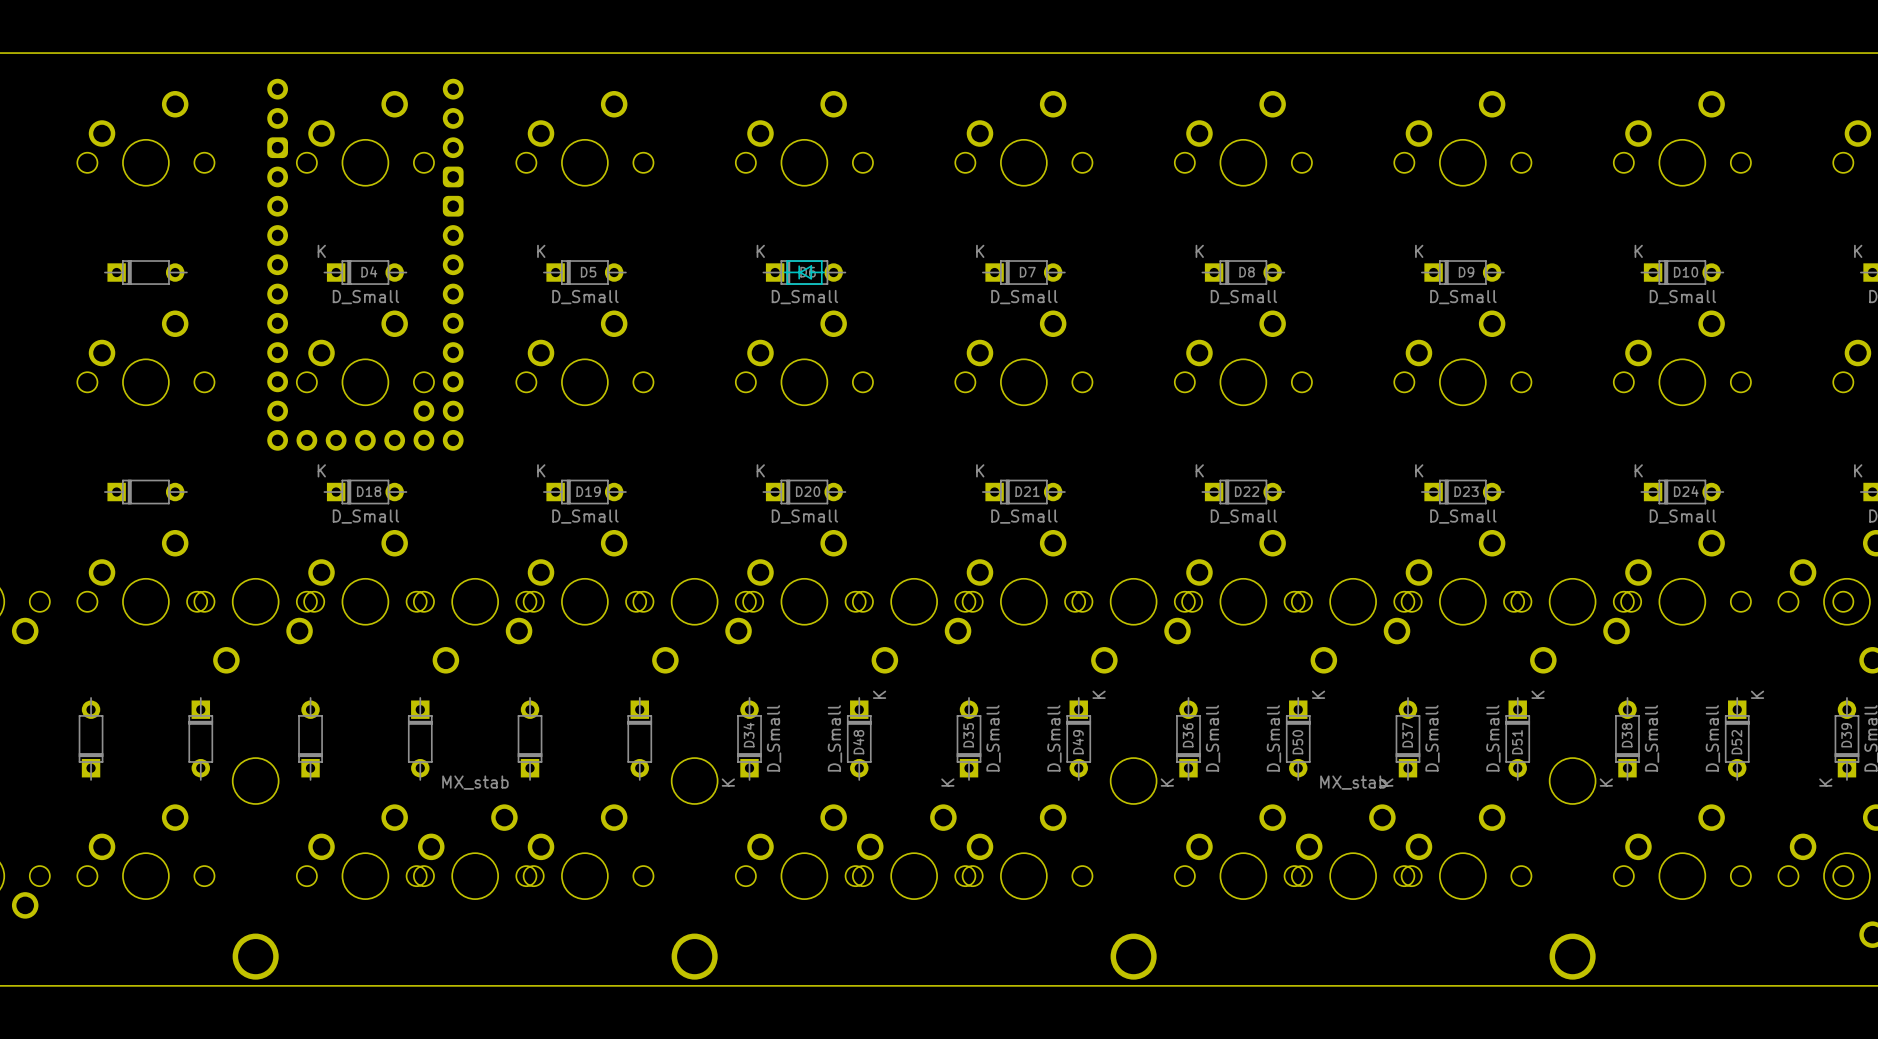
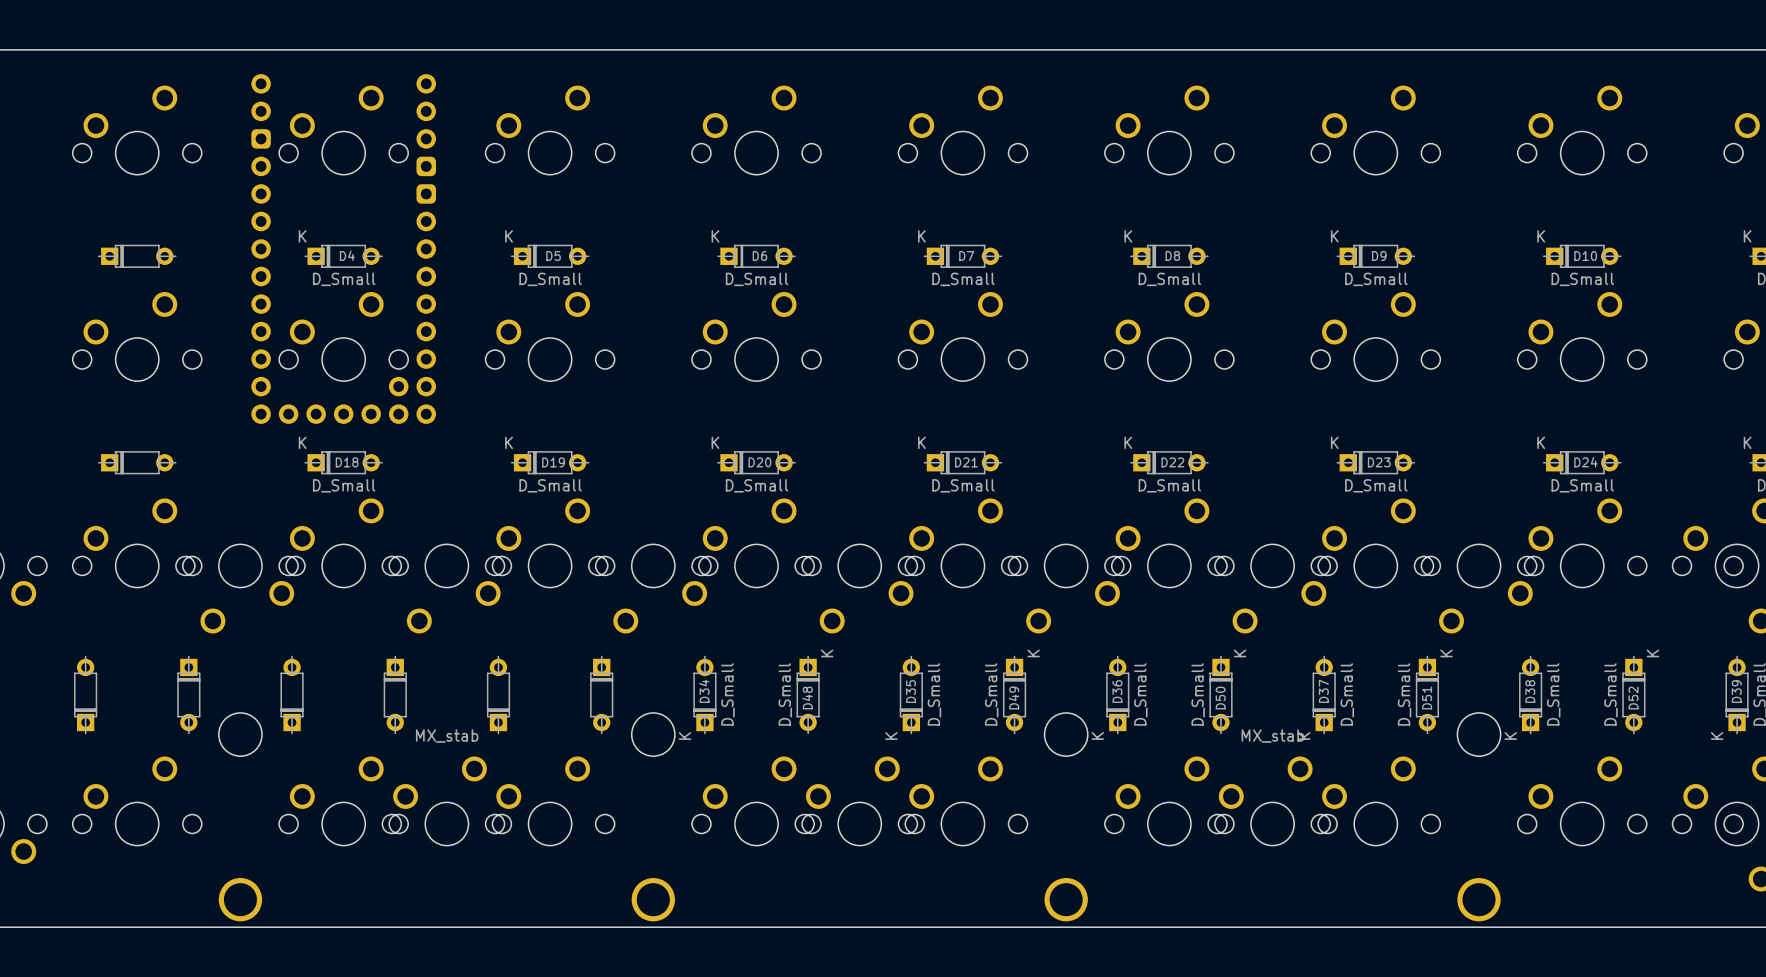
D6 footprint: [762, 260, 846, 285] -> [717, 244, 796, 268]

